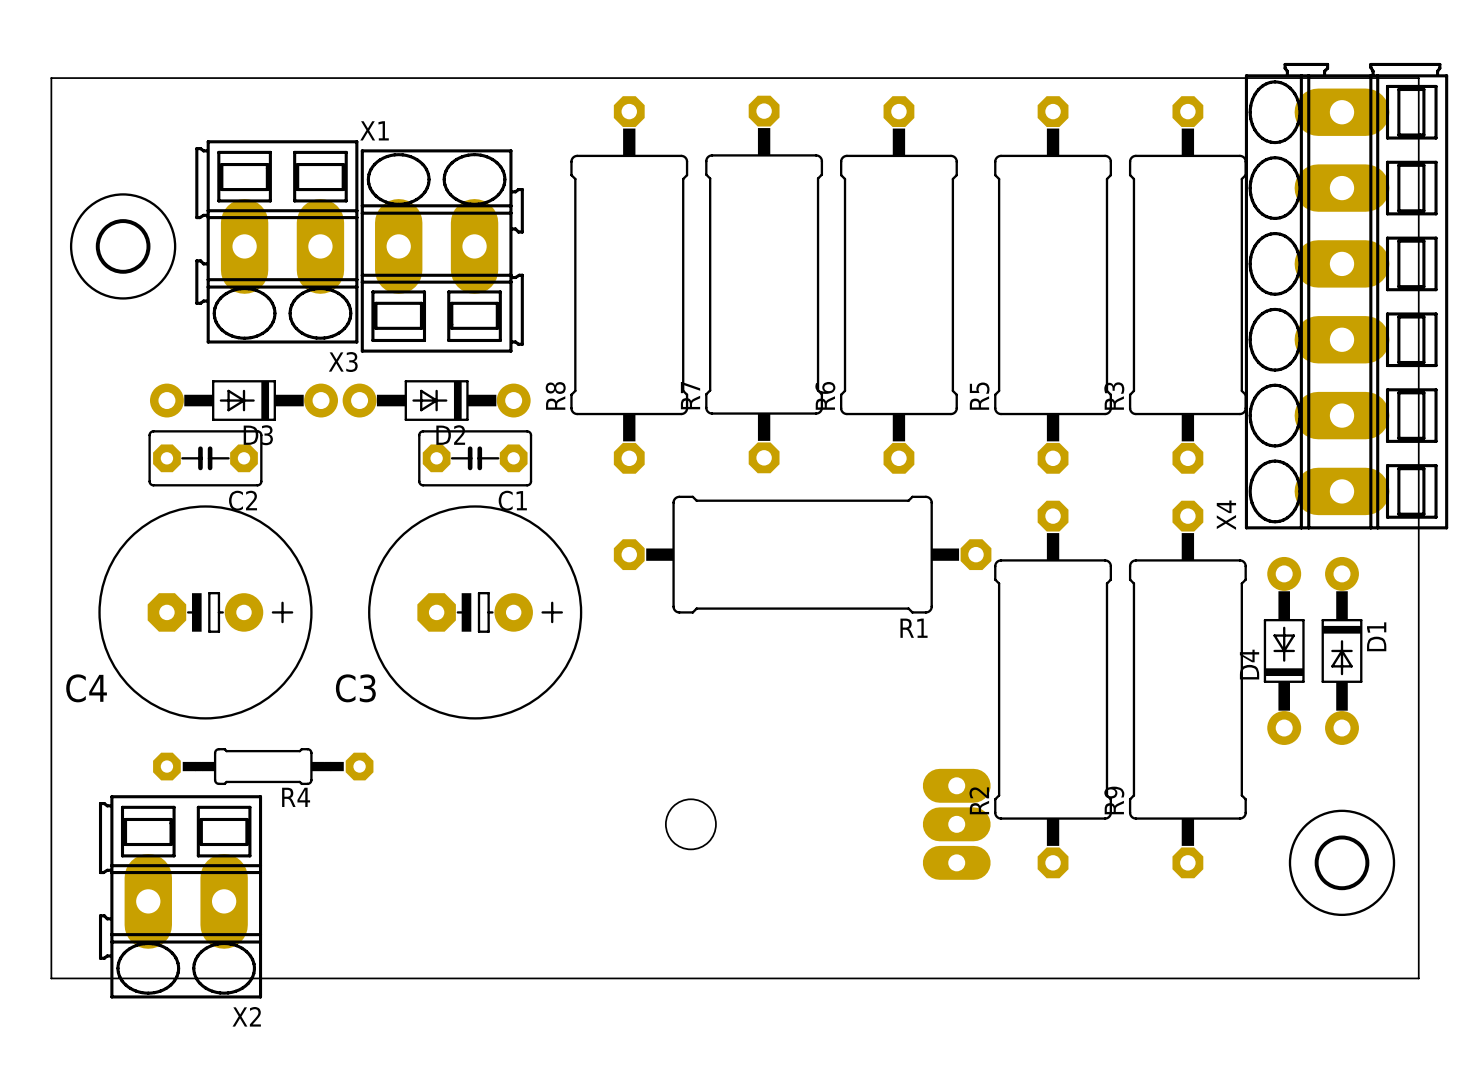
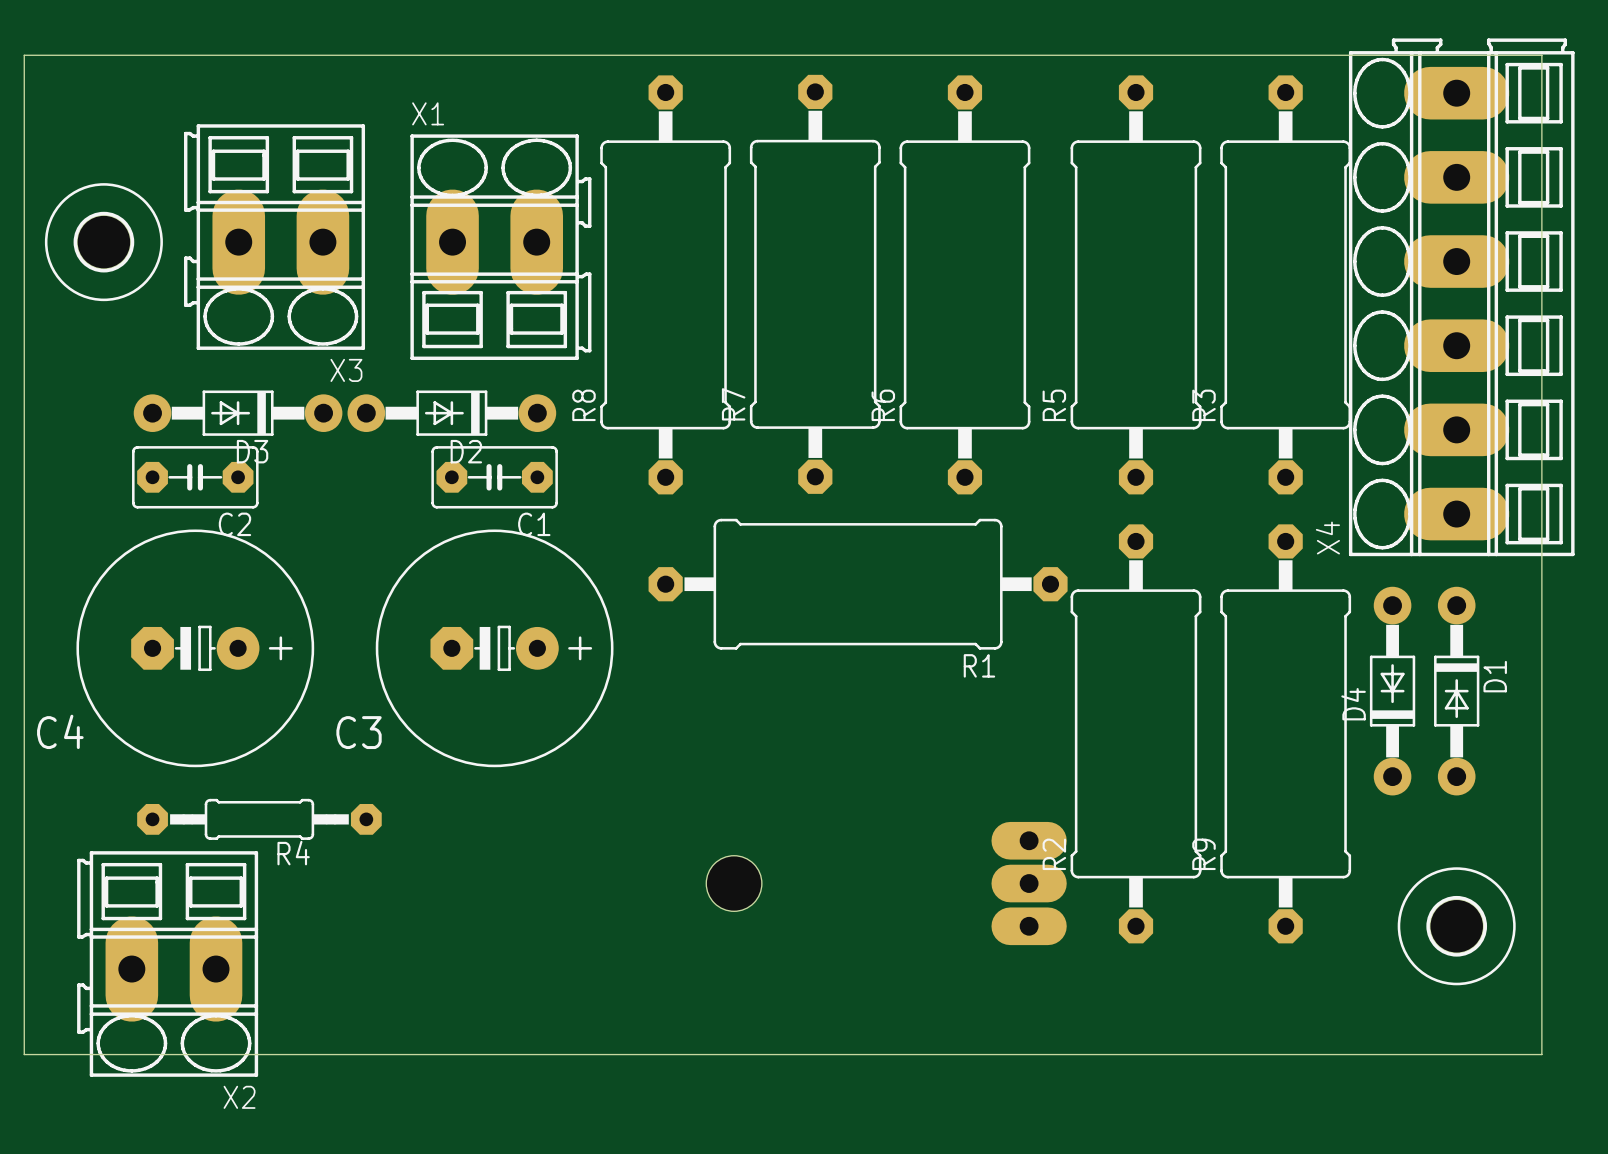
X1 position: (442, 250) -> (500, 247)

